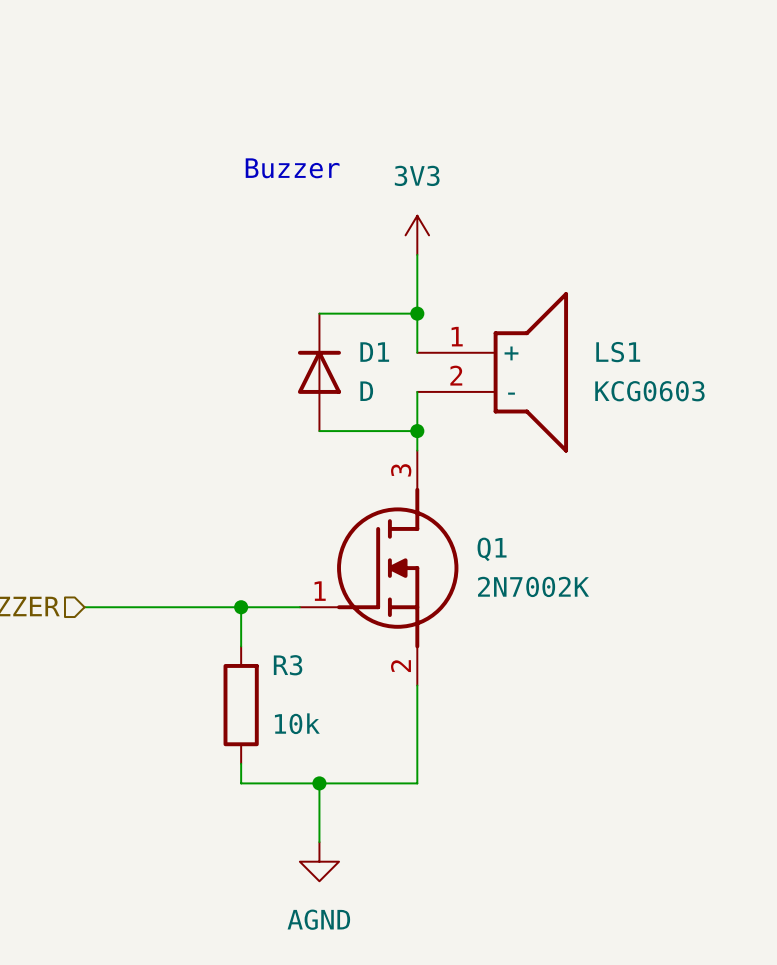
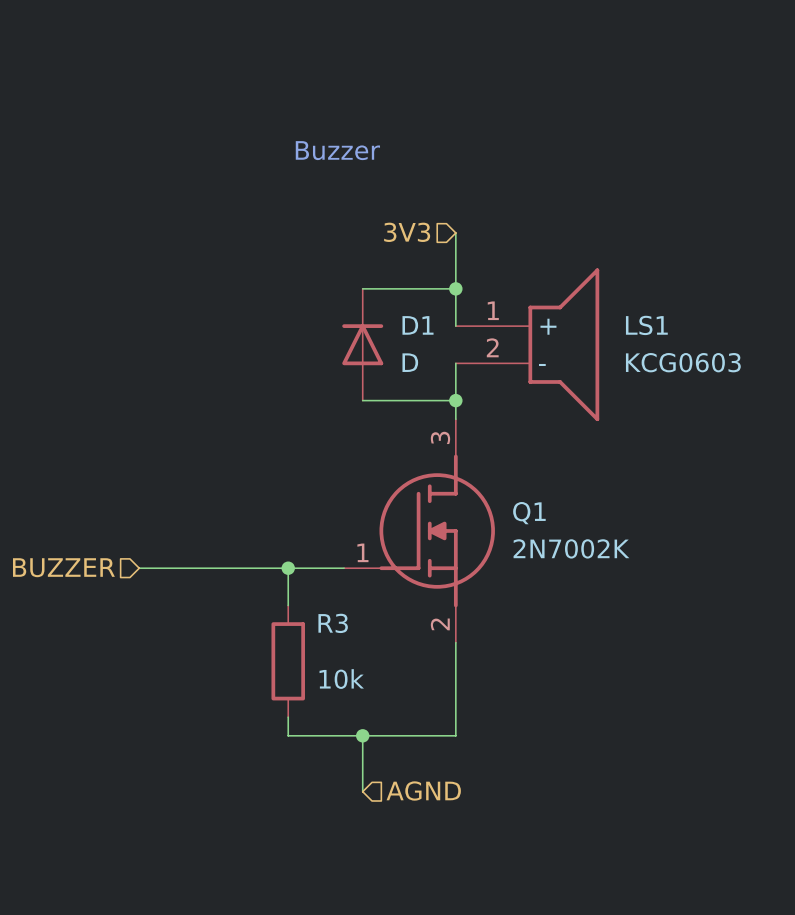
power symbol: 3V3 (417, 235) -> none
hierarchical label: none -> 3V3 (407, 232)
hierarchical label: none -> AGND (423, 791)
power symbol: AGND (319, 861) -> none

